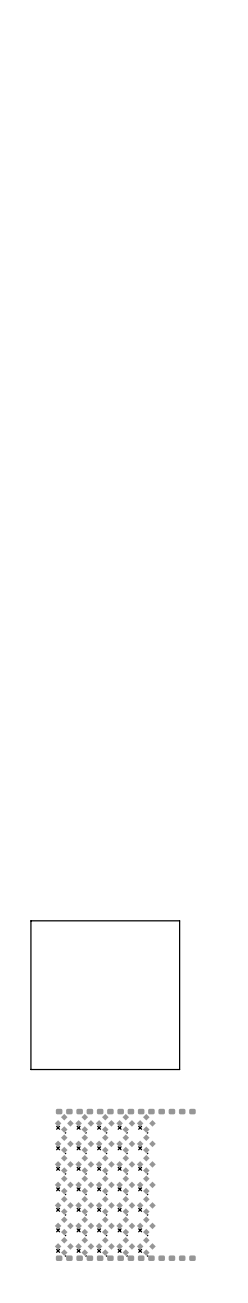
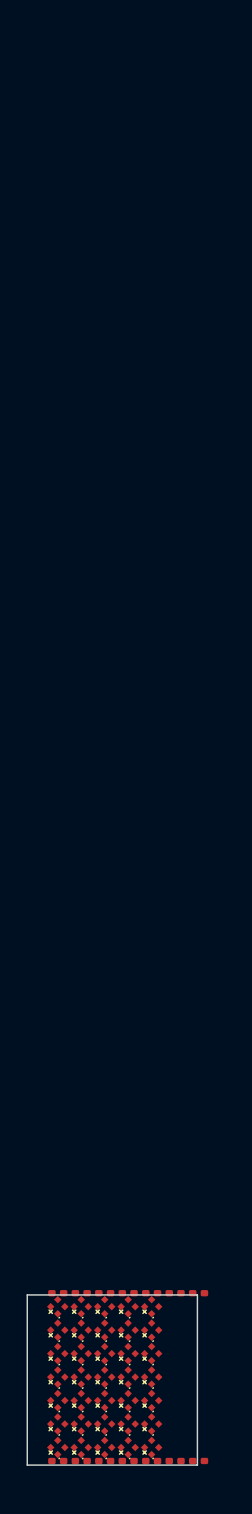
board edge: (30, 920) (30, 1069) (179, 1069) (179, 920) (30, 920) -> (27, 1294) (27, 1465) (197, 1465) (197, 1294) (27, 1294)

